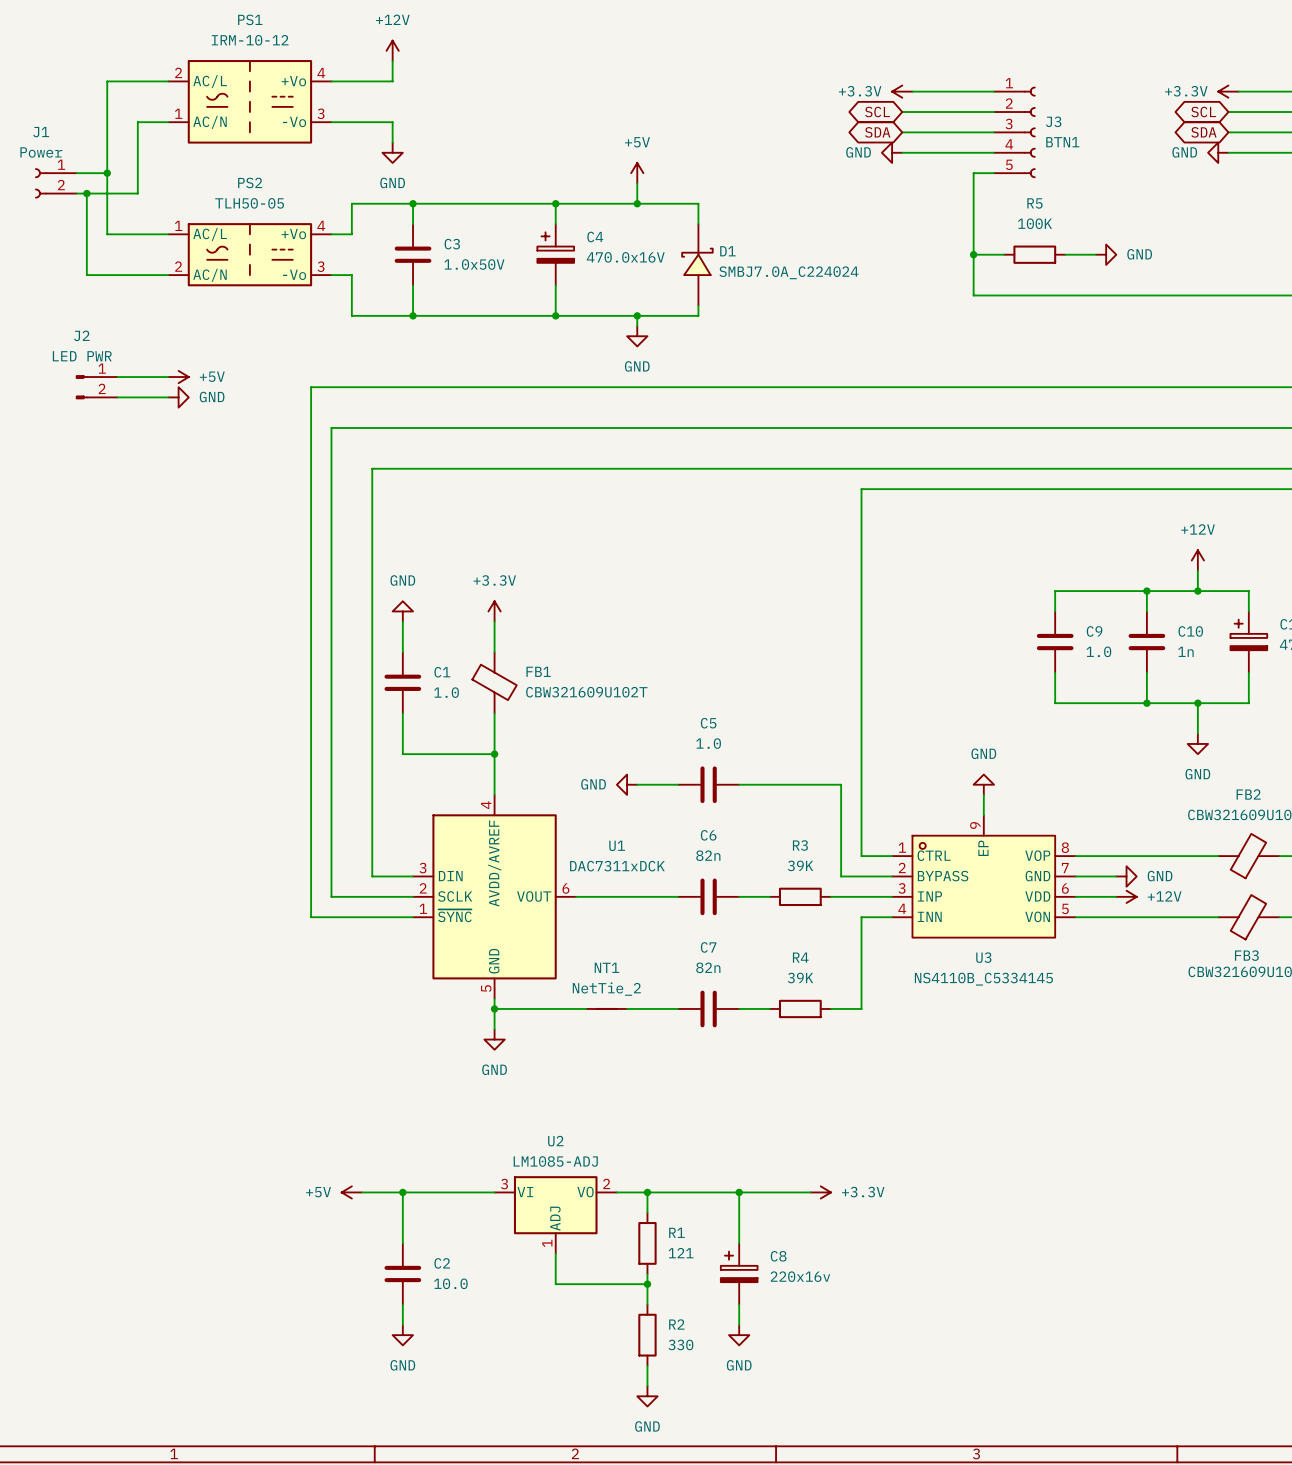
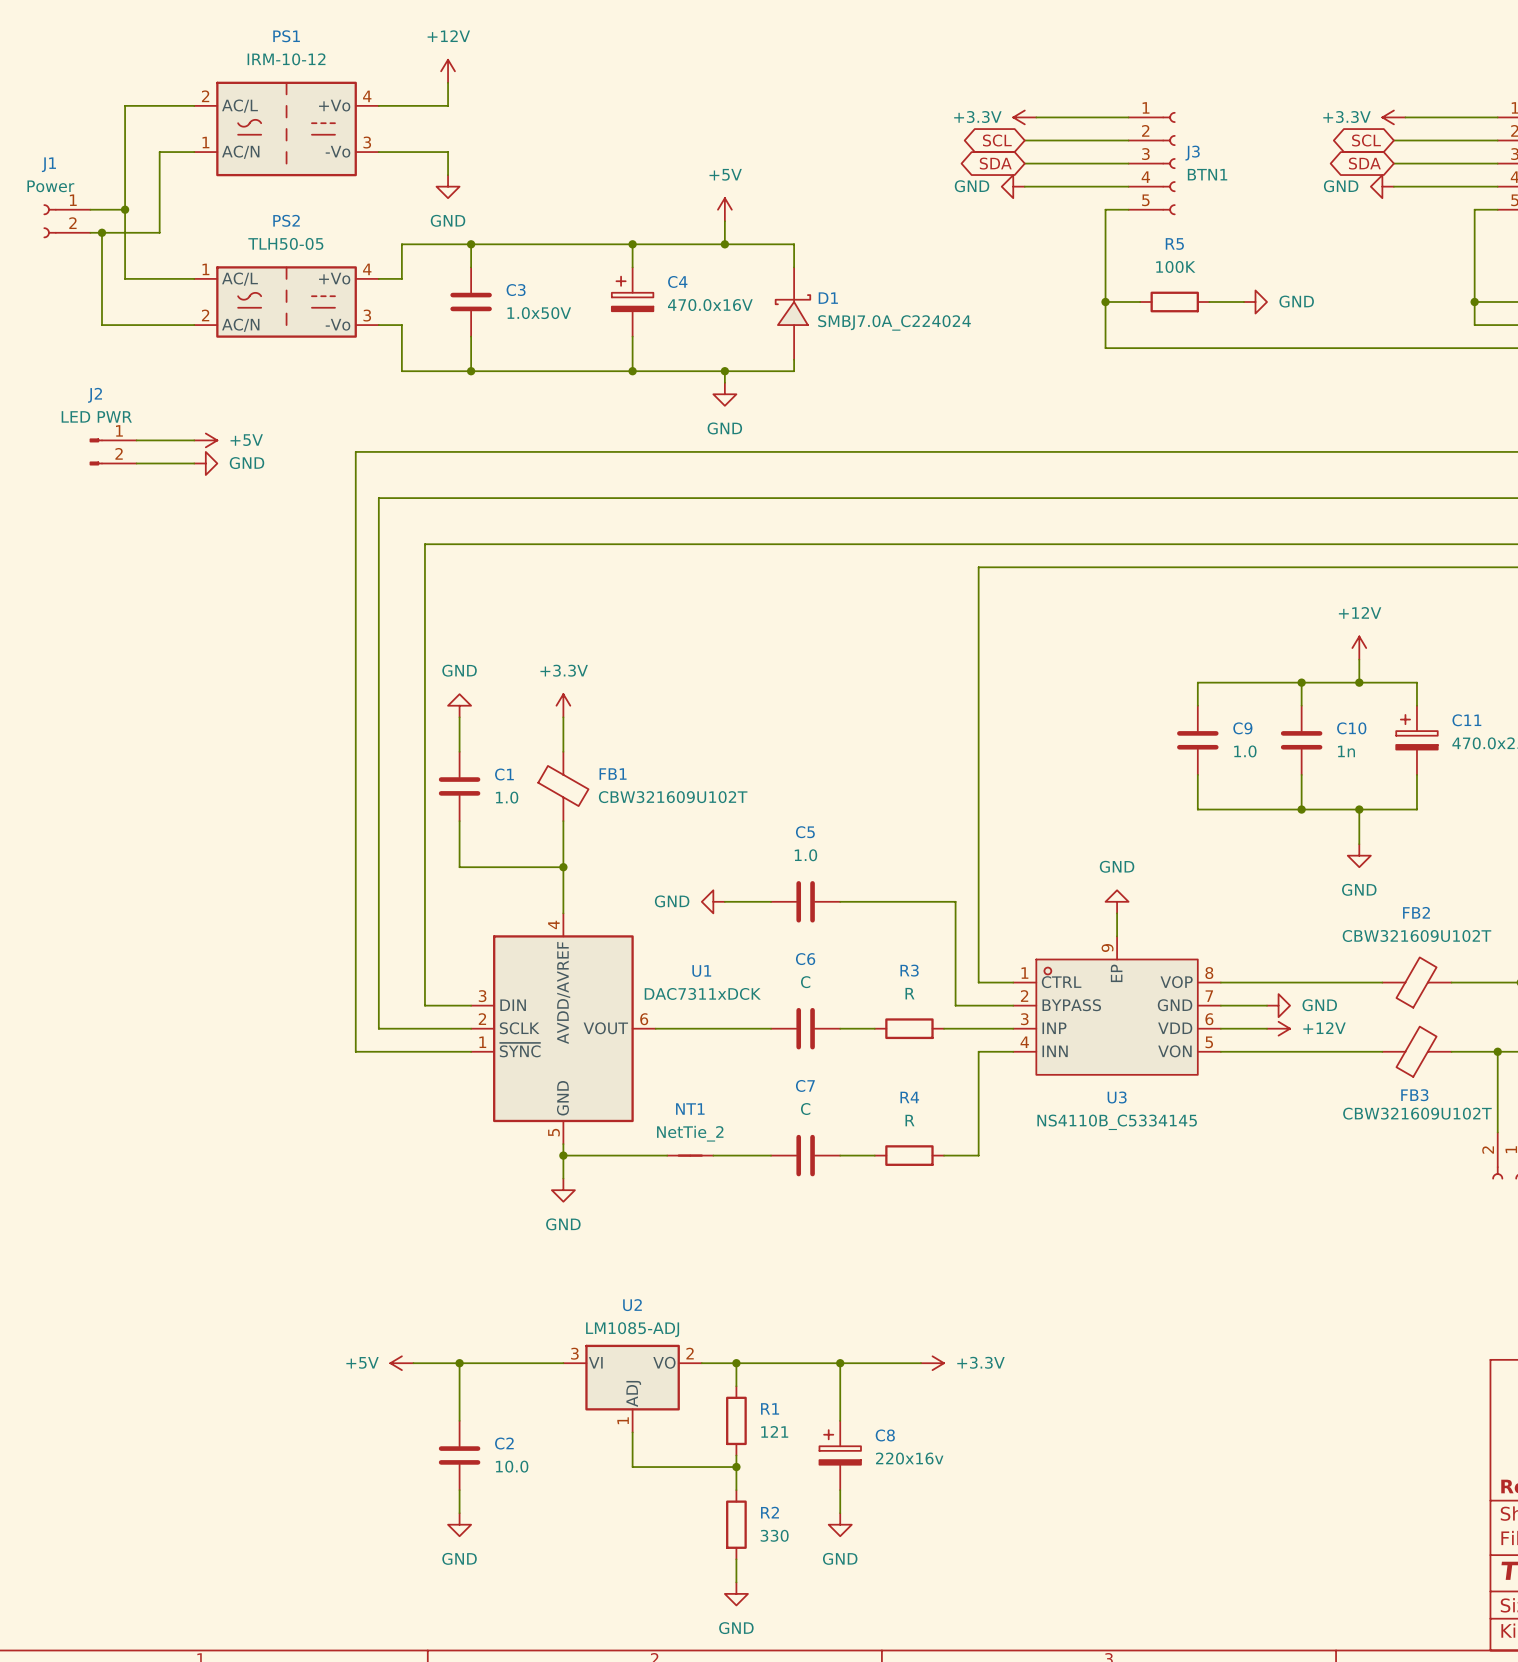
C6 value: 82n (708, 855) -> C (805, 982)
R3 value: 39K (800, 865) -> R (909, 993)
C7 value: 82n (708, 967) -> C (805, 1109)
R4 value: 39K (800, 978) -> R (909, 1120)

